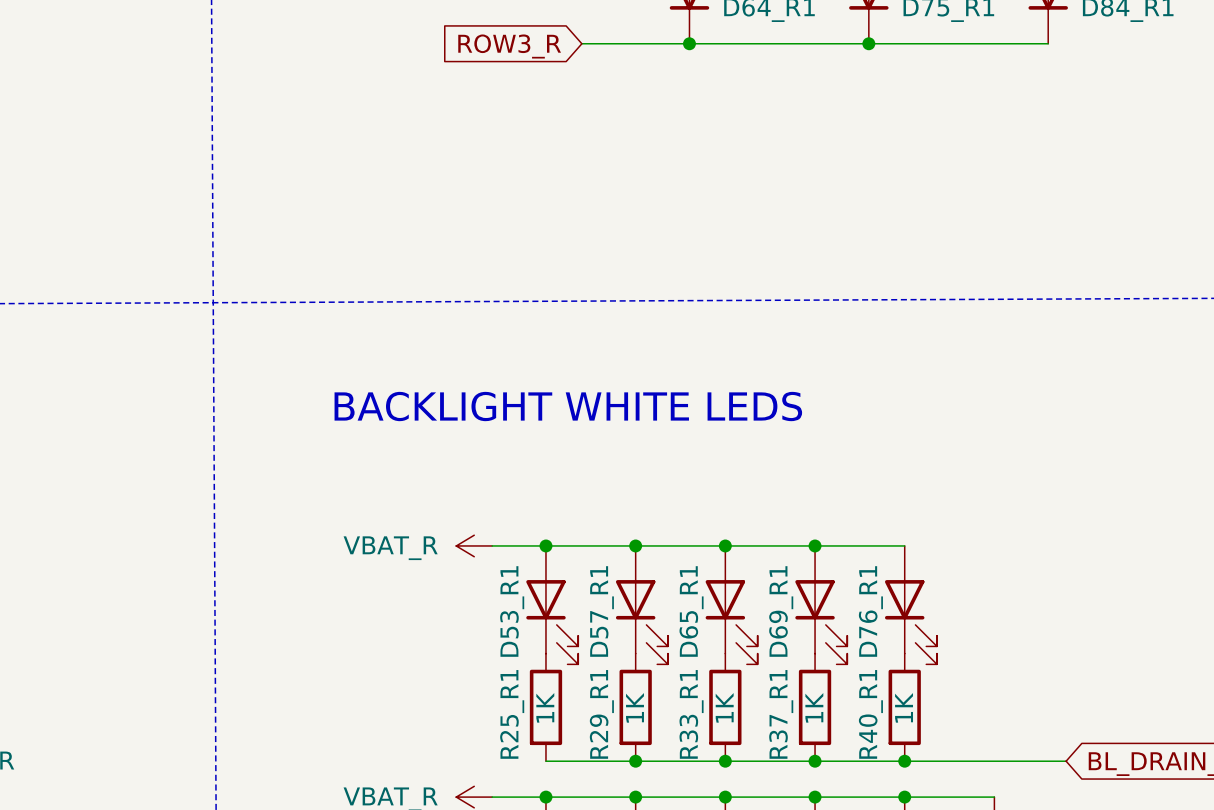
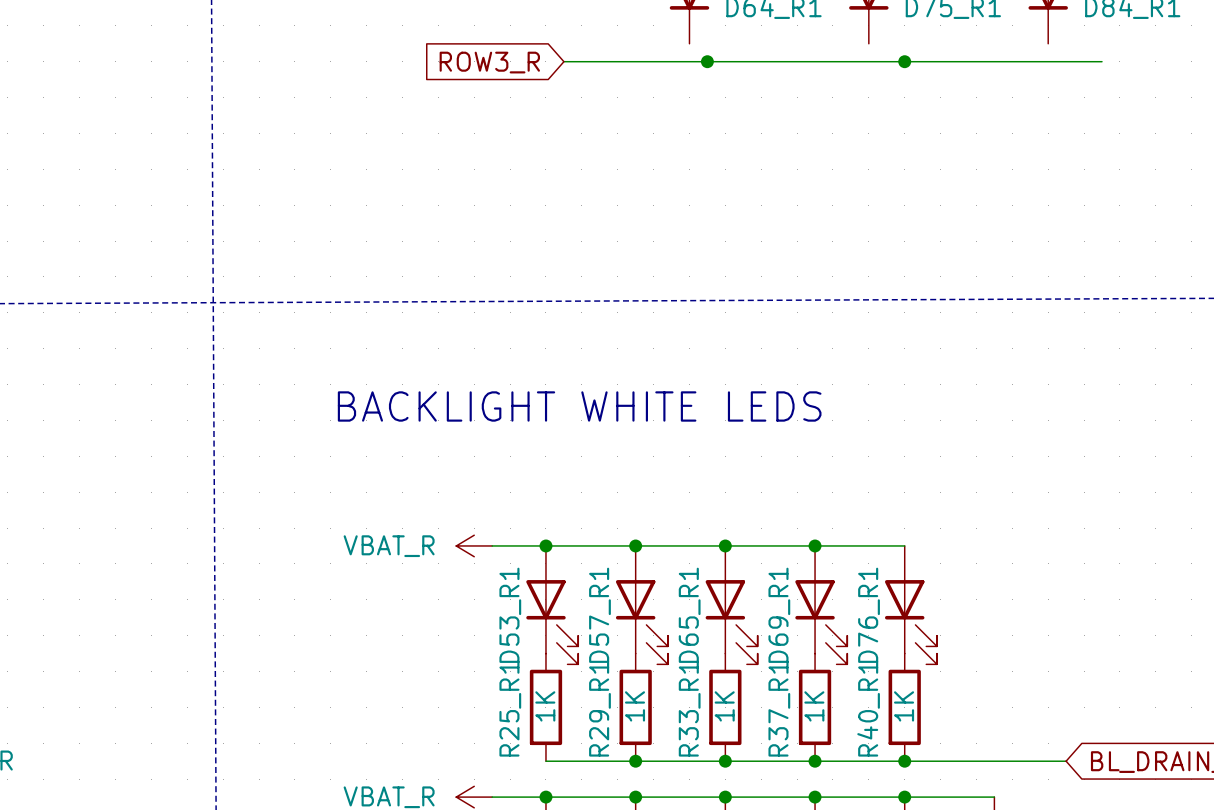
wire: (581, 43) (1048, 43) -> none
junction position: (689, 43) -> (707, 61)
junction position: (868, 43) -> (904, 61)
global label position: ROW3_R (509, 46) -> ROW3_R (489, 62)
wire: none -> (563, 61) (1102, 61)

